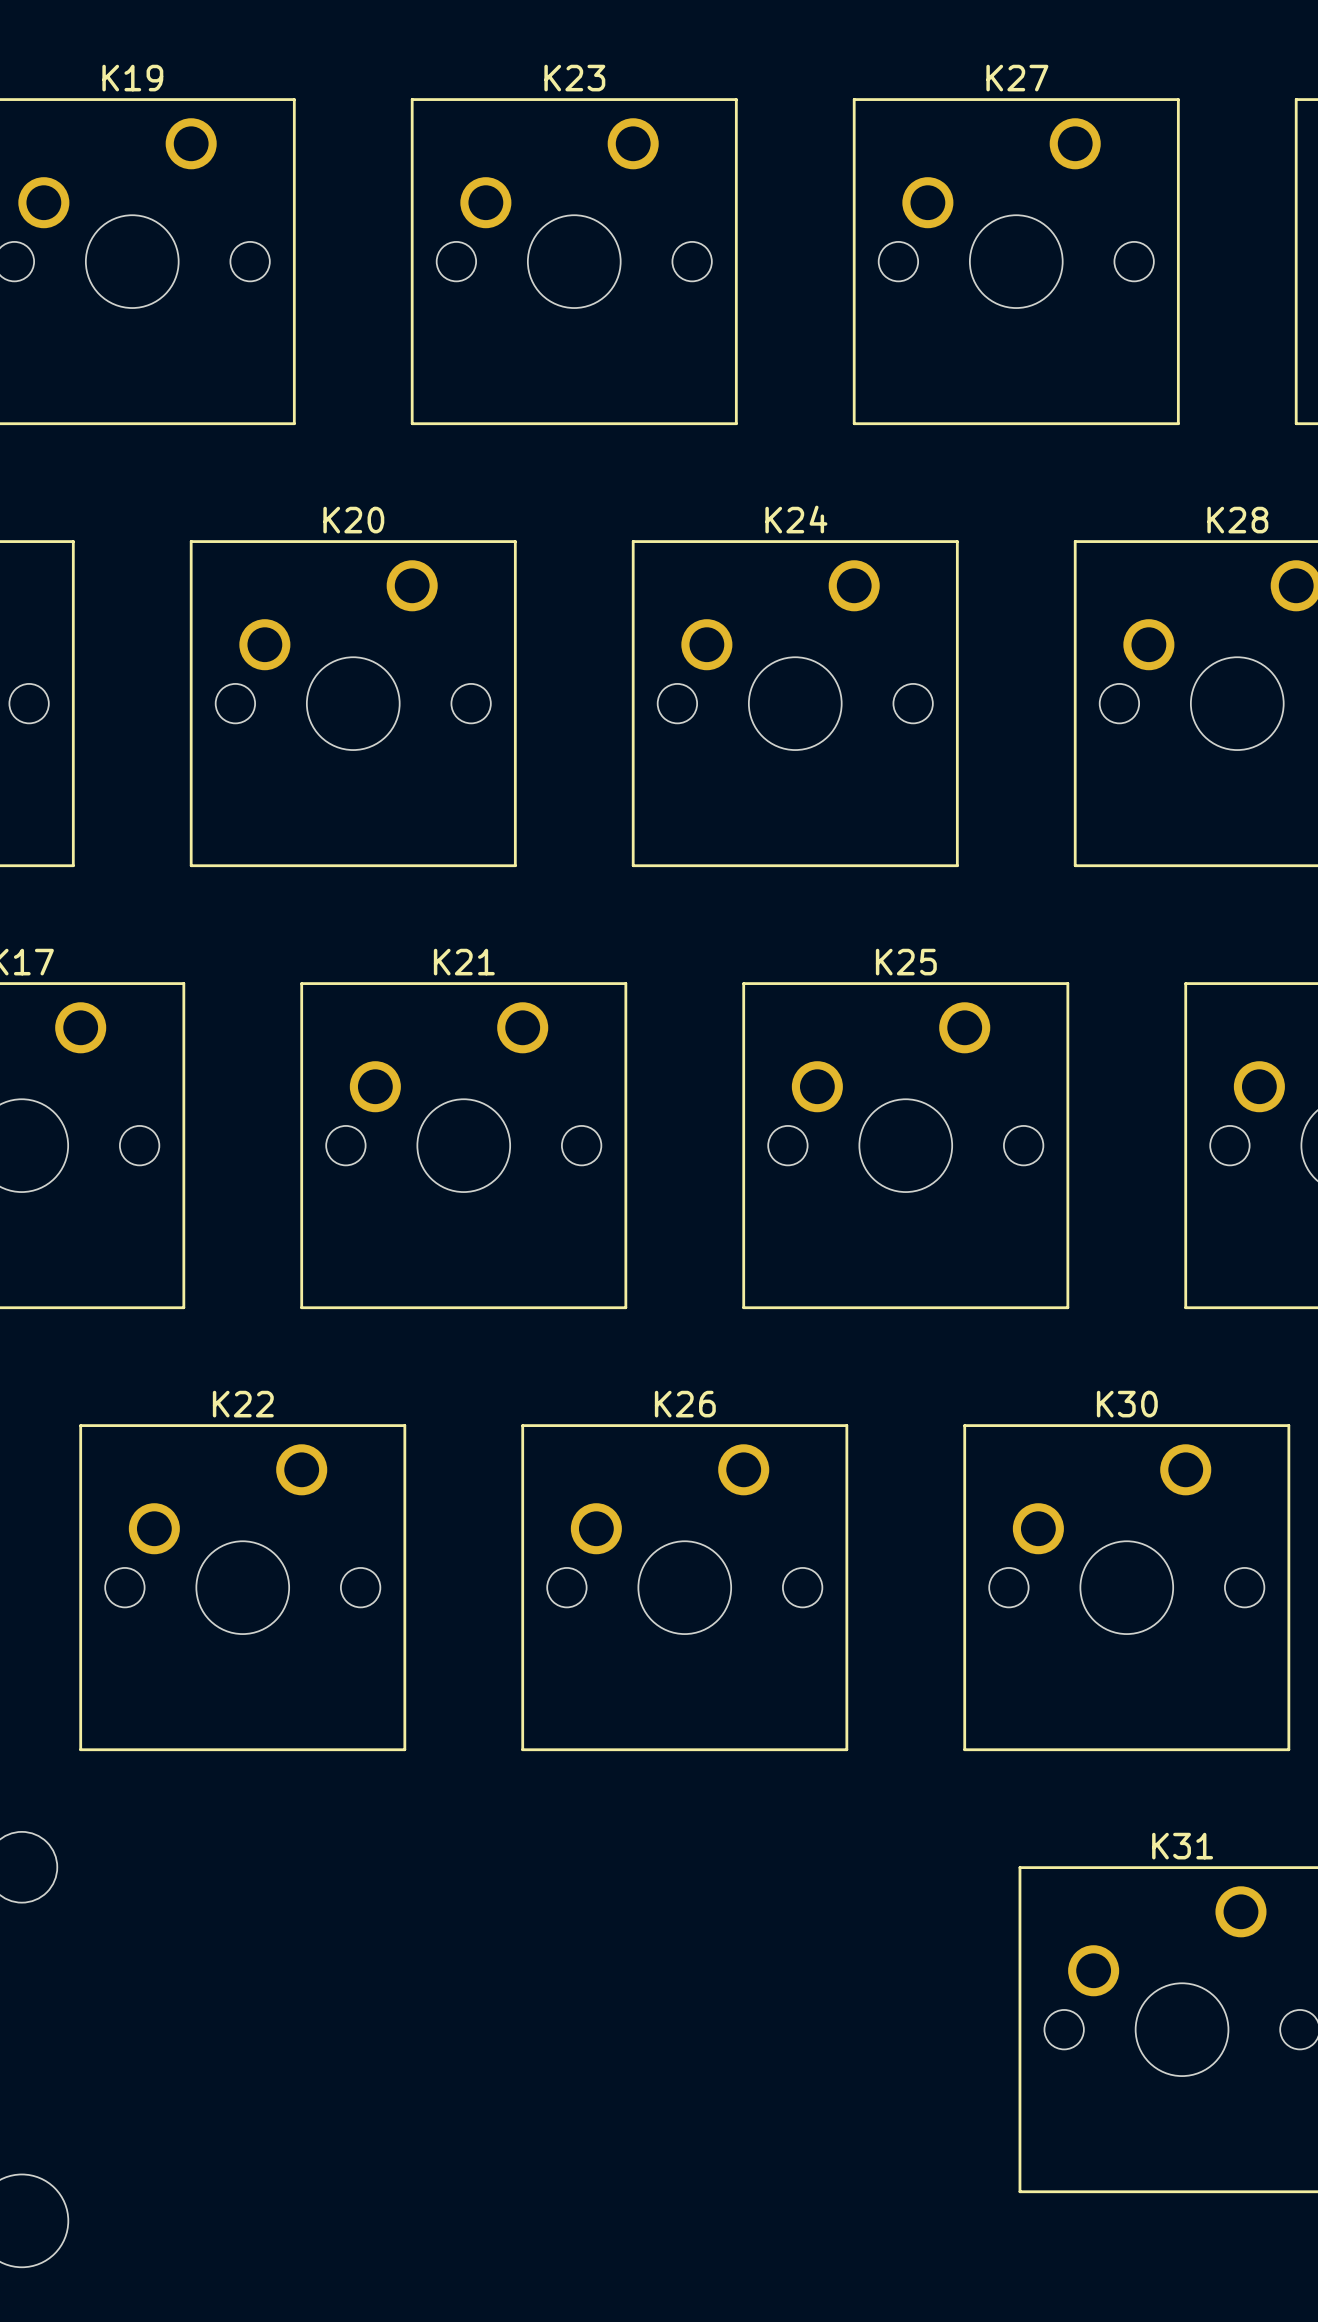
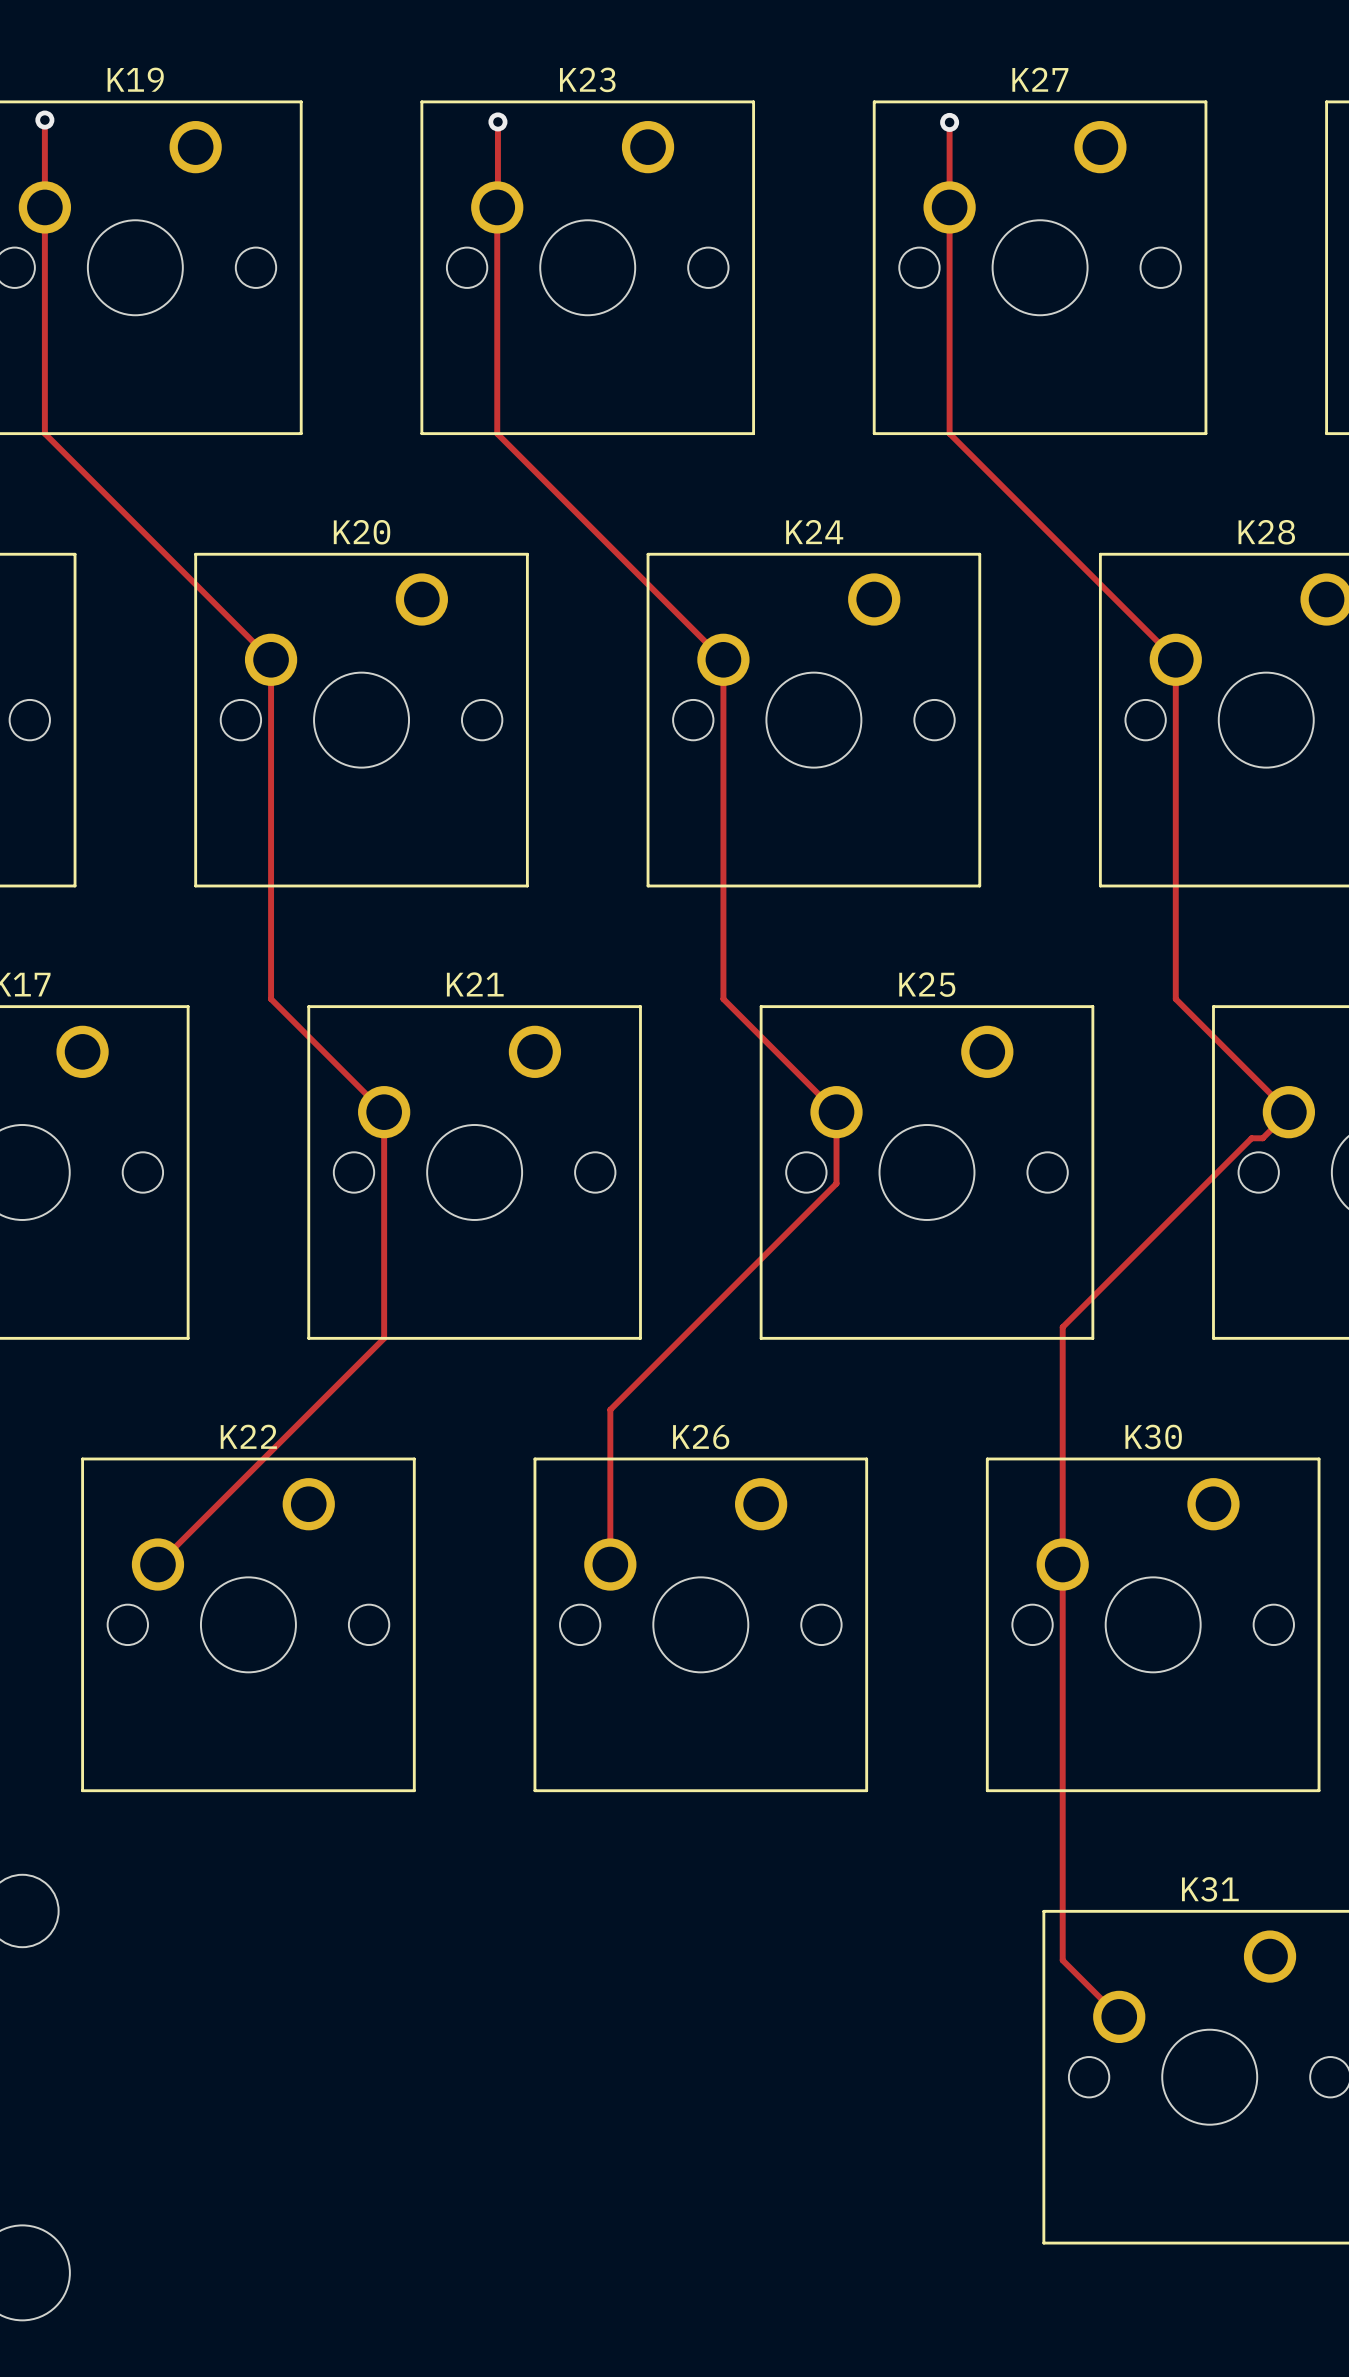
track: none -> (44, 120) (44, 433) (271, 659) (271, 999) (384, 1112) (384, 1338) (157, 1564)
via: none -> (44, 120)
track: none -> (497, 121) (497, 433) (723, 659) (723, 999) (836, 1112) (836, 1183) (610, 1409) (610, 1564)
via: none -> (497, 121)
track: none -> (949, 122) (949, 433) (1175, 659) (1175, 999) (1288, 1112) (1262, 1138) (1251, 1138) (1062, 1327) (1062, 1960) (1119, 2016)
via: none -> (949, 122)

